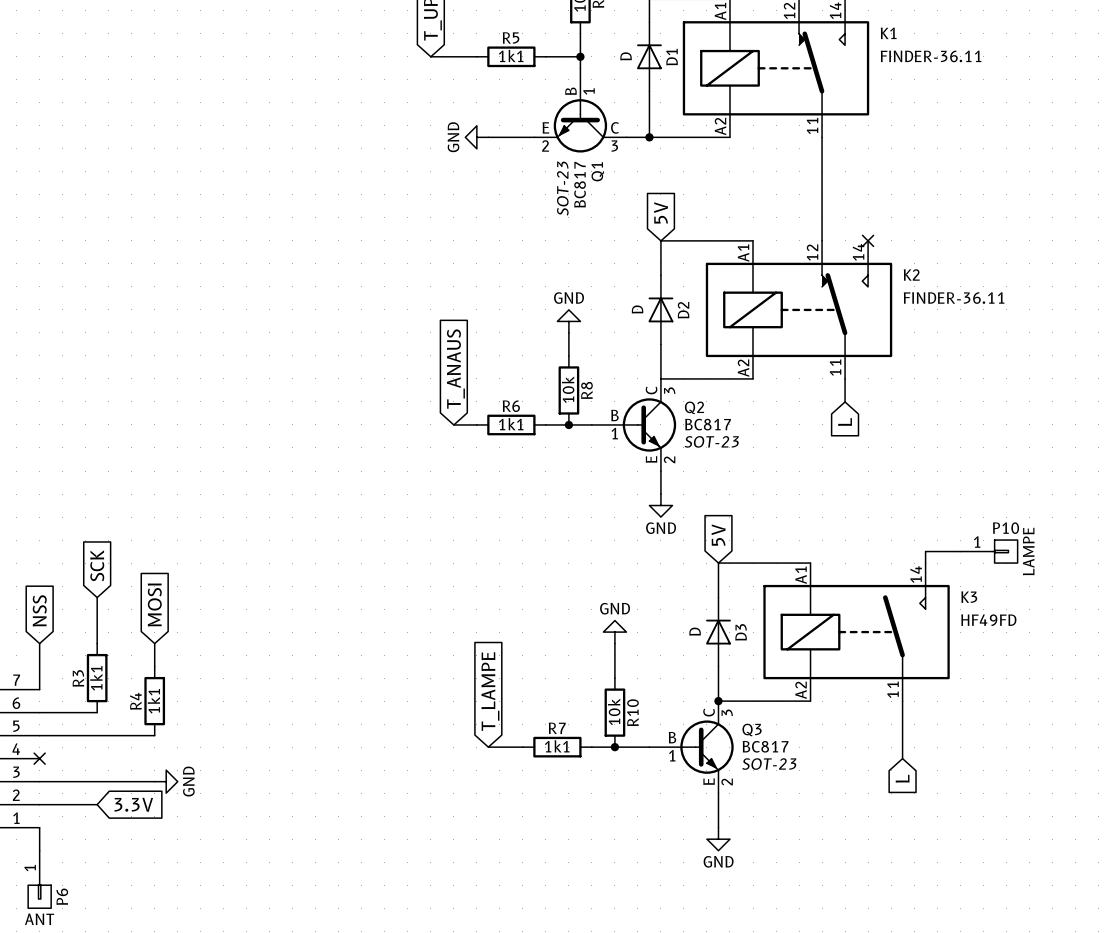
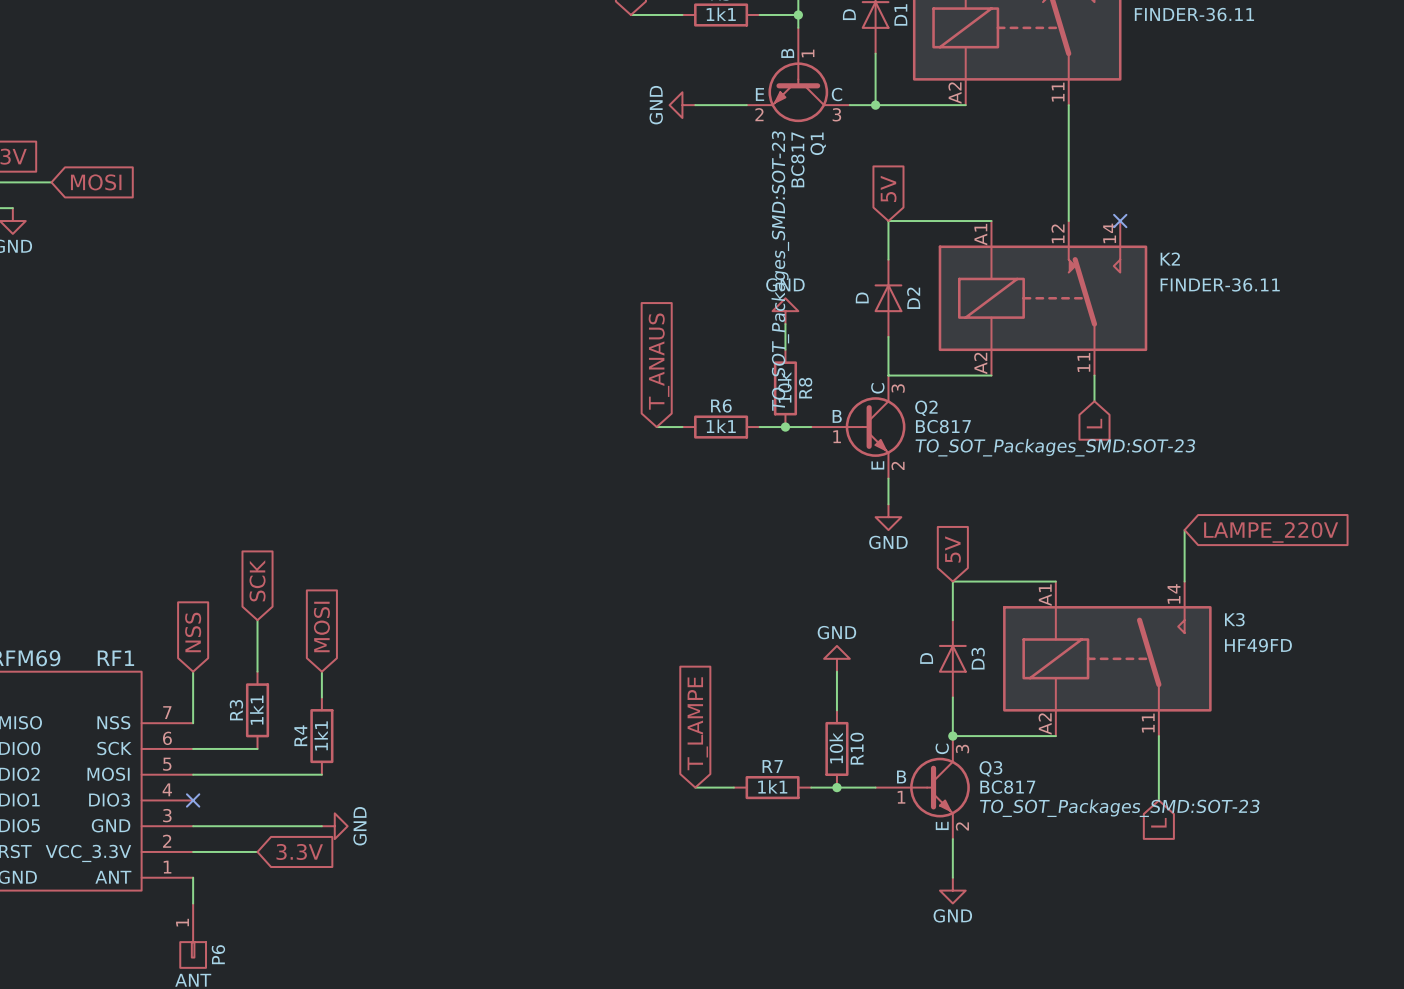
Q1 text: SOT-23 (562, 188) -> TO_SOT_Packages_SMD:SOT-23 (780, 271)
Q2 text: SOT-23 (711, 441) -> TO_SOT_Packages_SMD:SOT-23 (1055, 447)
global label: none -> LAMPE_220V (1271, 532)
wire: (925, 551) (960, 551) -> (1184, 568) (1184, 530)
P10: LAMPE (988, 551) -> none
Q3 text: SOT-23 (769, 764) -> TO_SOT_Packages_SMD:SOT-23 (1119, 808)

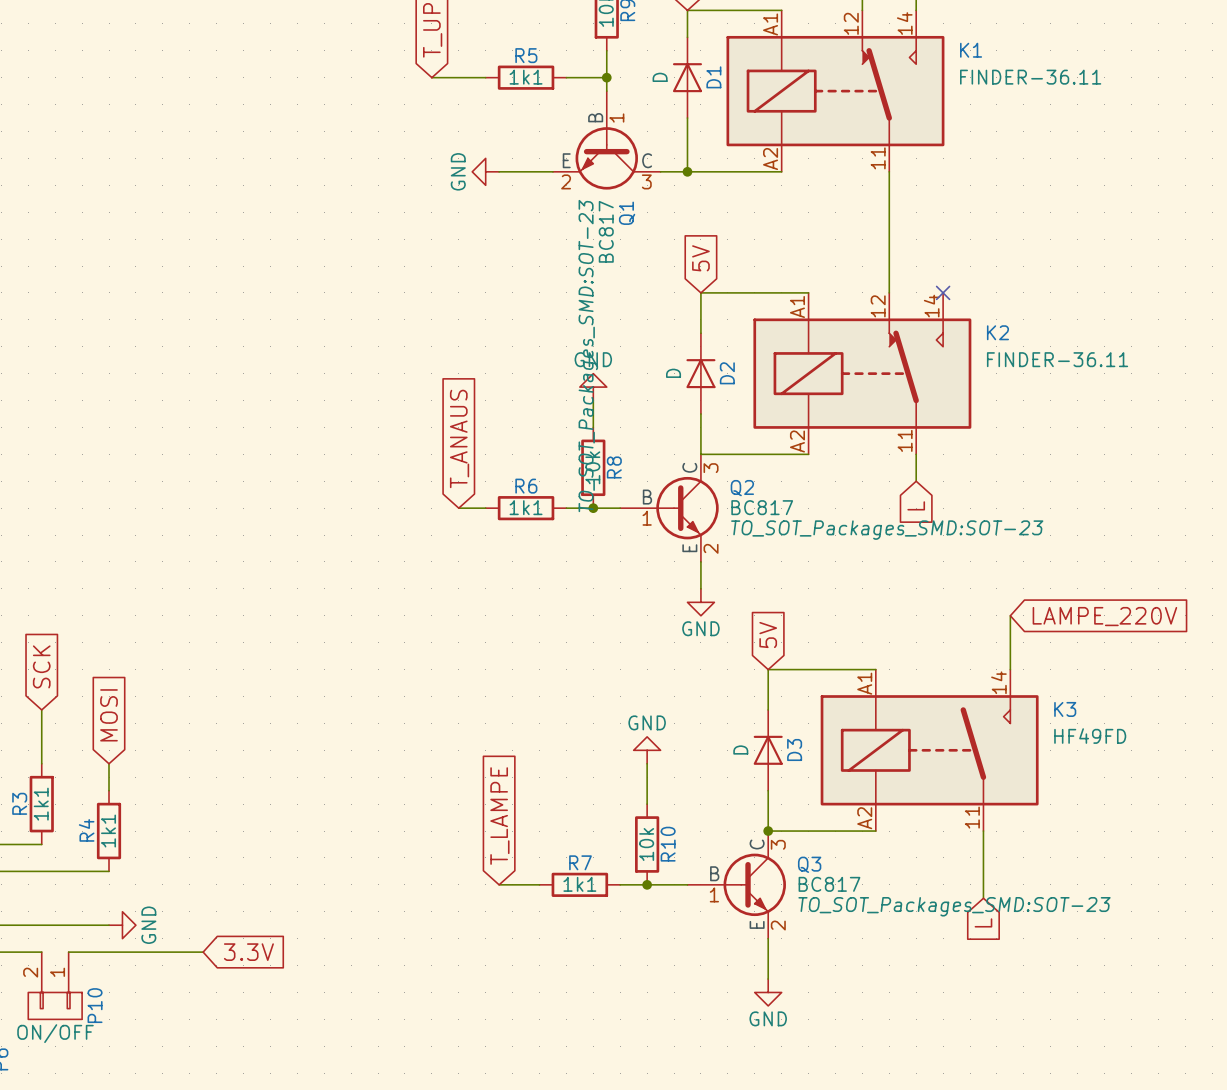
wire: none -> (68, 952) (203, 952)
global label position: 3.3V (299, 851) -> 3.3V (248, 952)
P10: none -> ON/OFF (55, 985)

